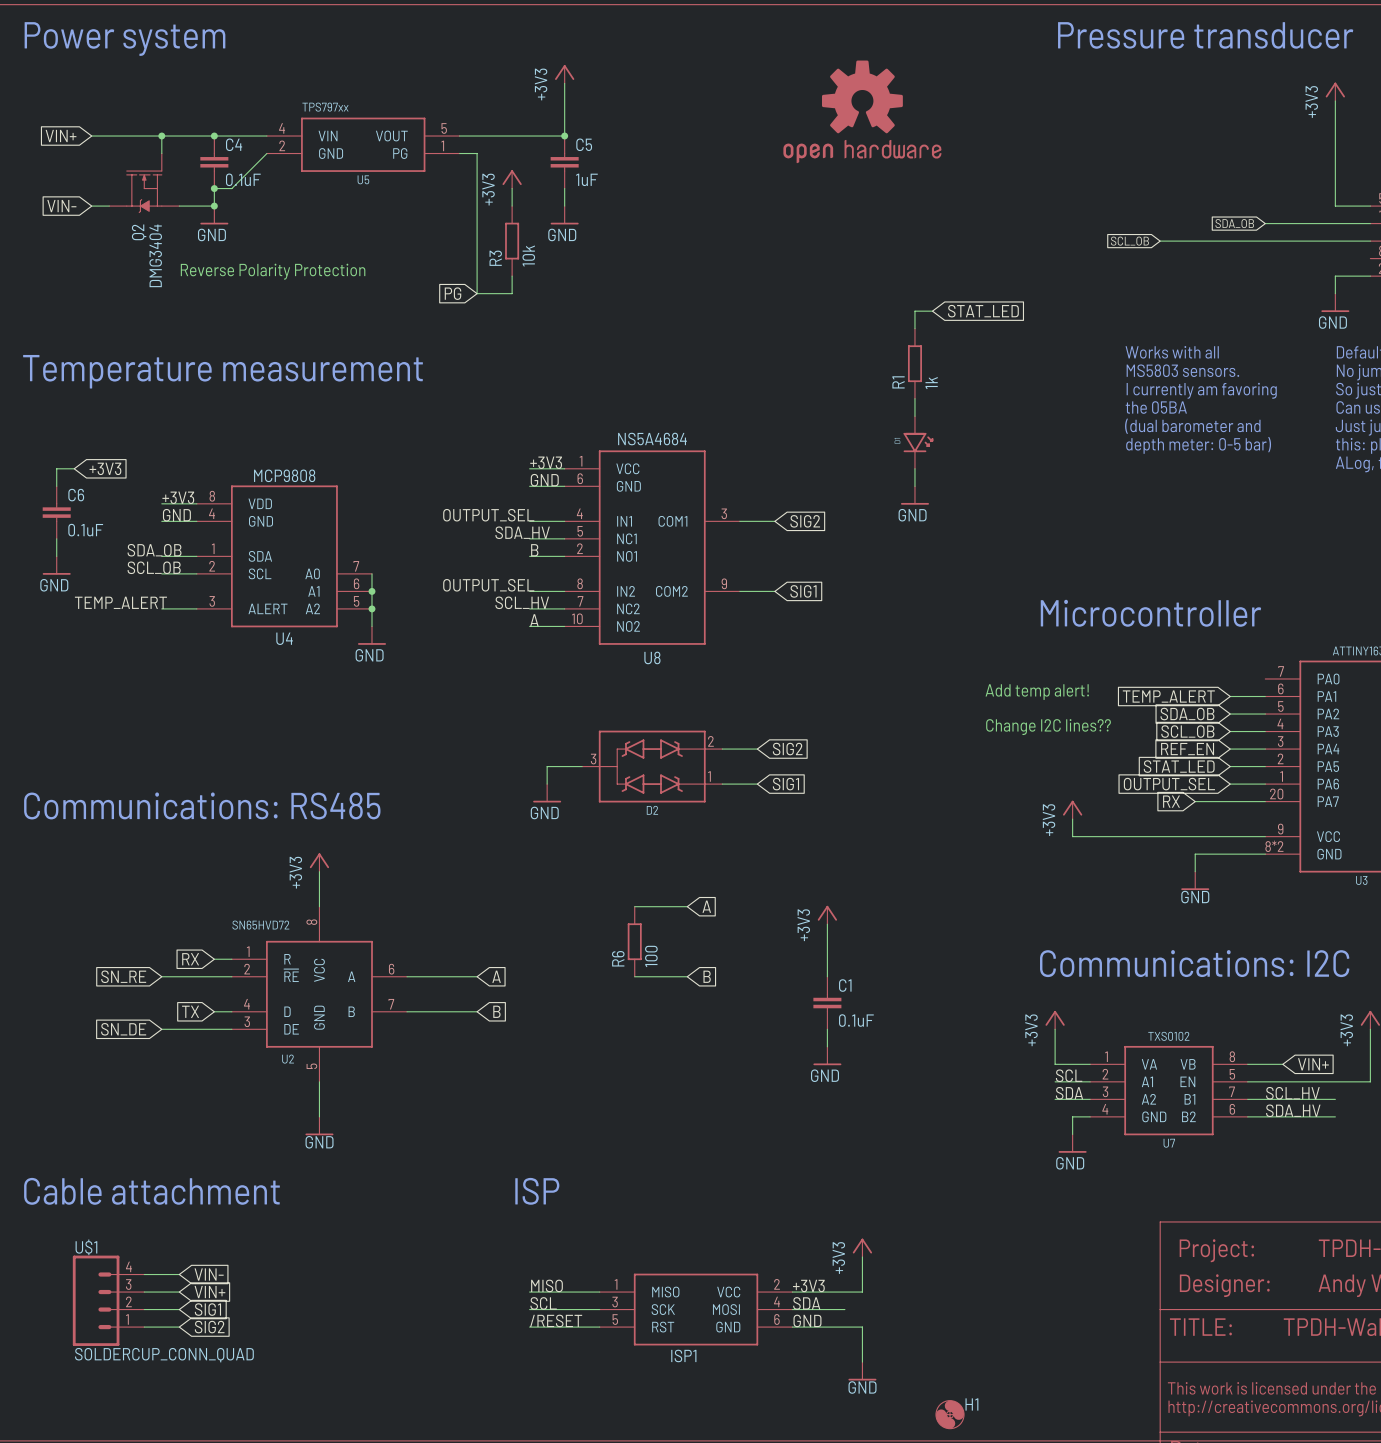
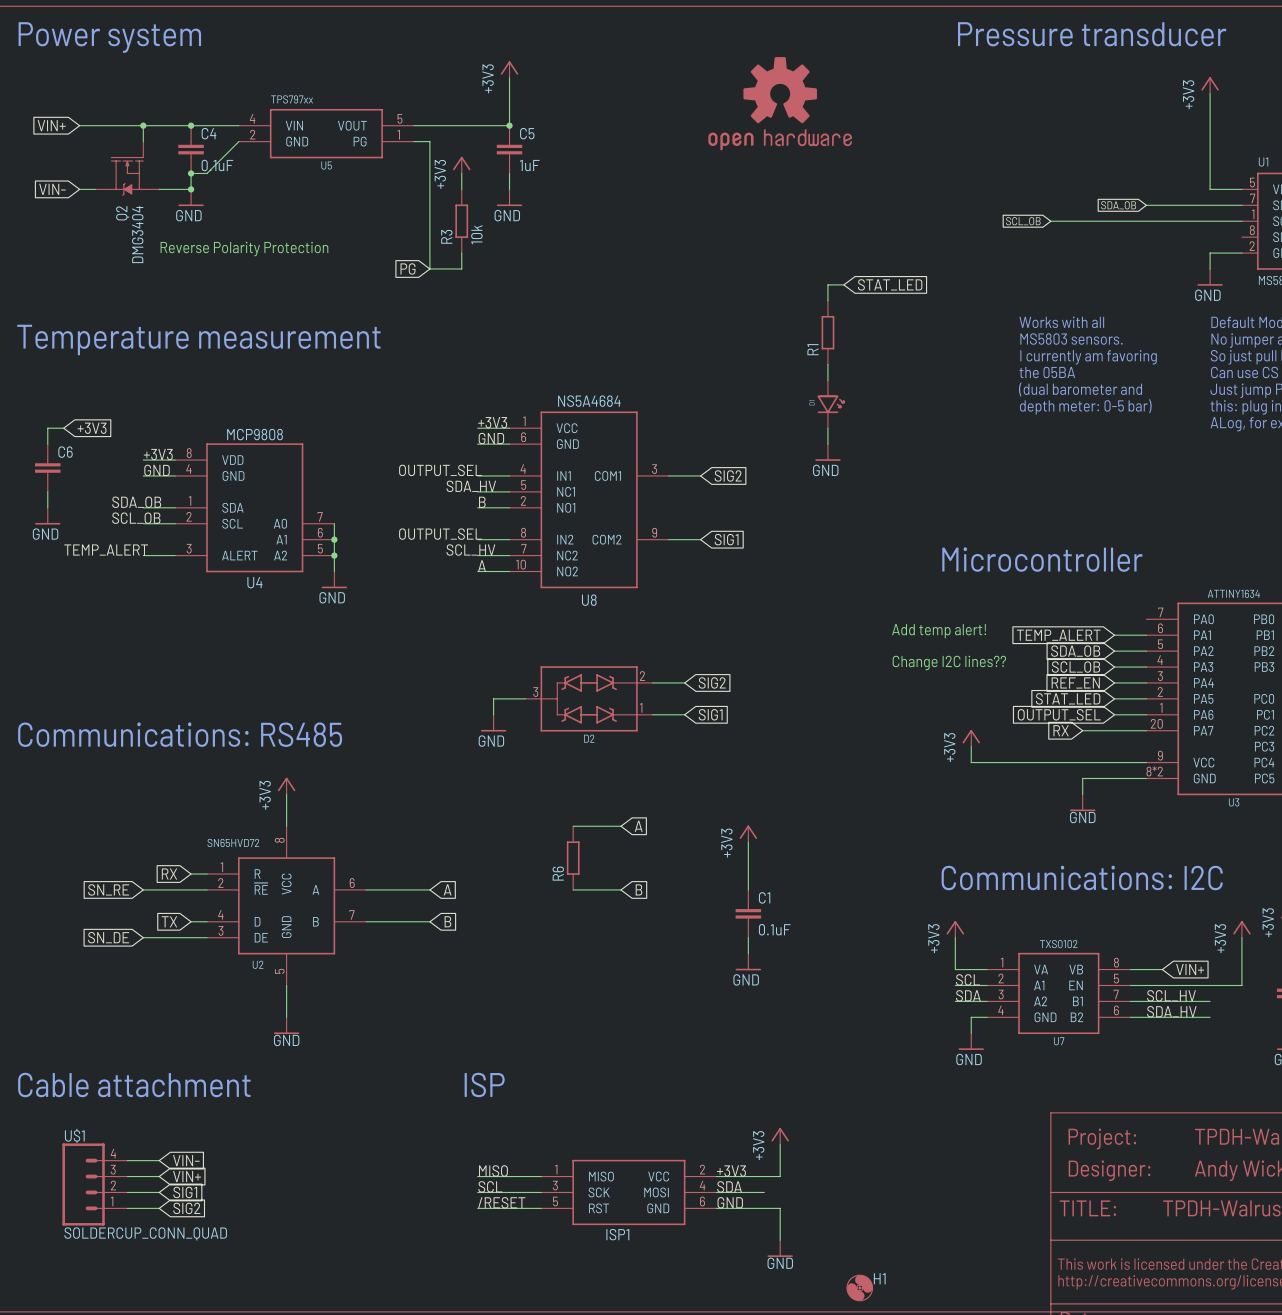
R1 value: 1k (931, 383) -> none
C6 value: 0.1uF (85, 530) -> none
R6 value: 100 (651, 956) -> none

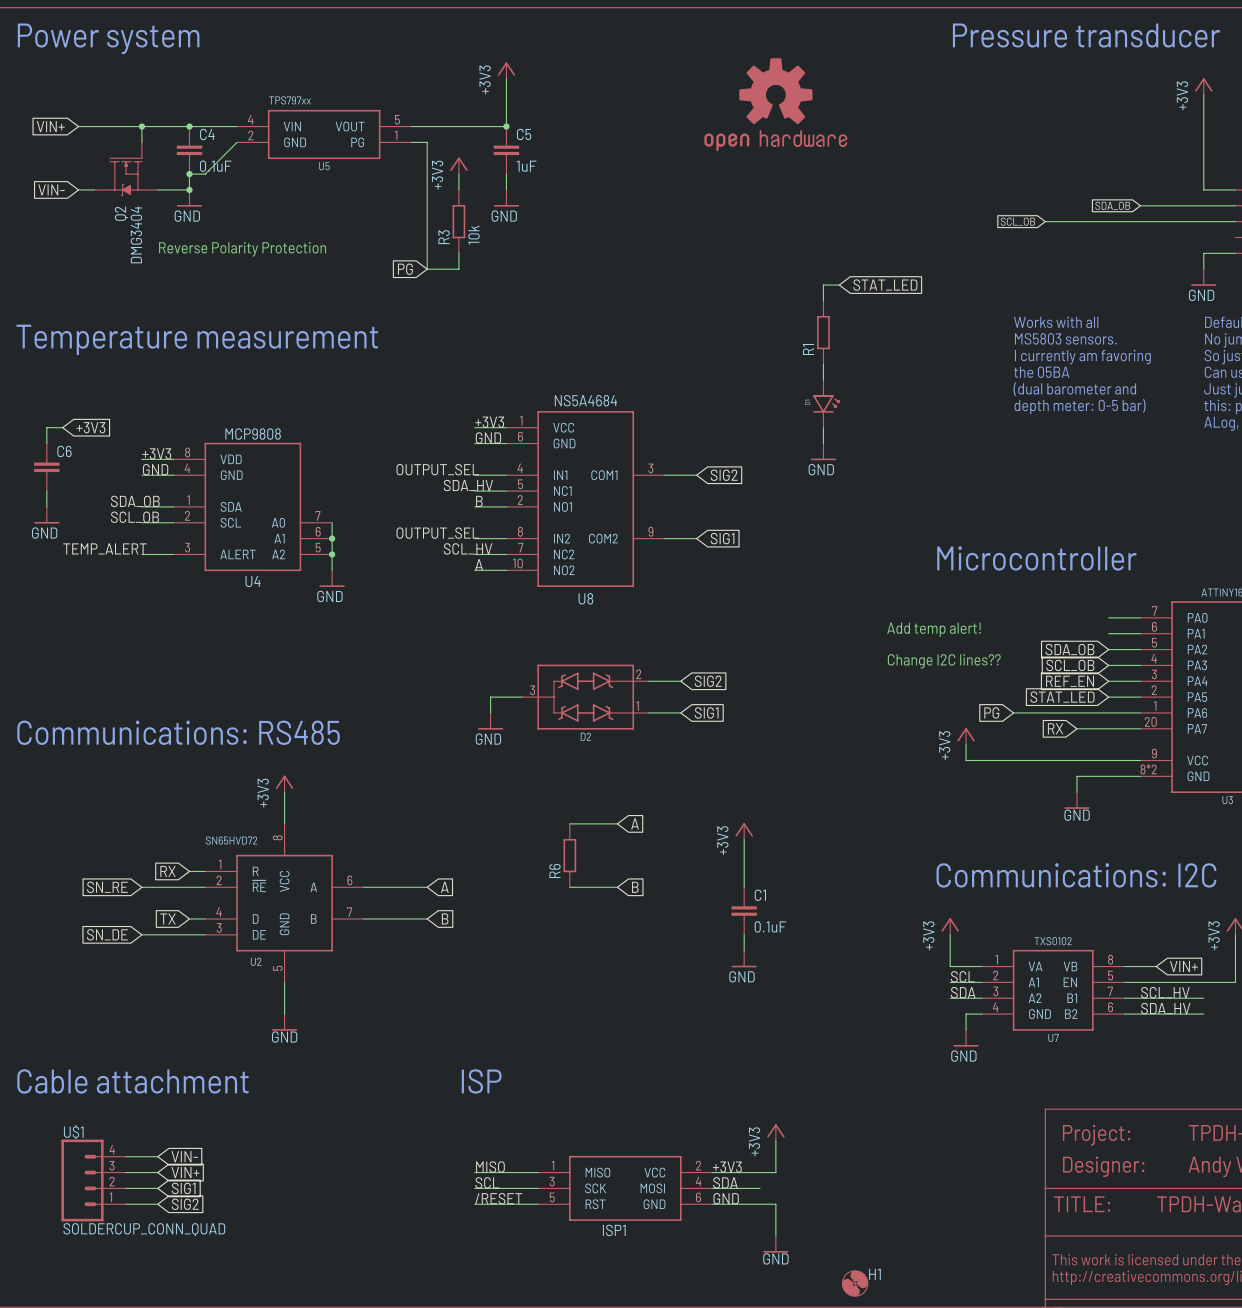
wire: none -> (1108, 617) (1140, 617)
global label: TEMP_ALERT (1058, 635) -> none
global label: none -> PG (991, 712)
wire: none -> (1013, 712) (1108, 712)
global label: OUTPUT_SEL (1059, 714) -> none

